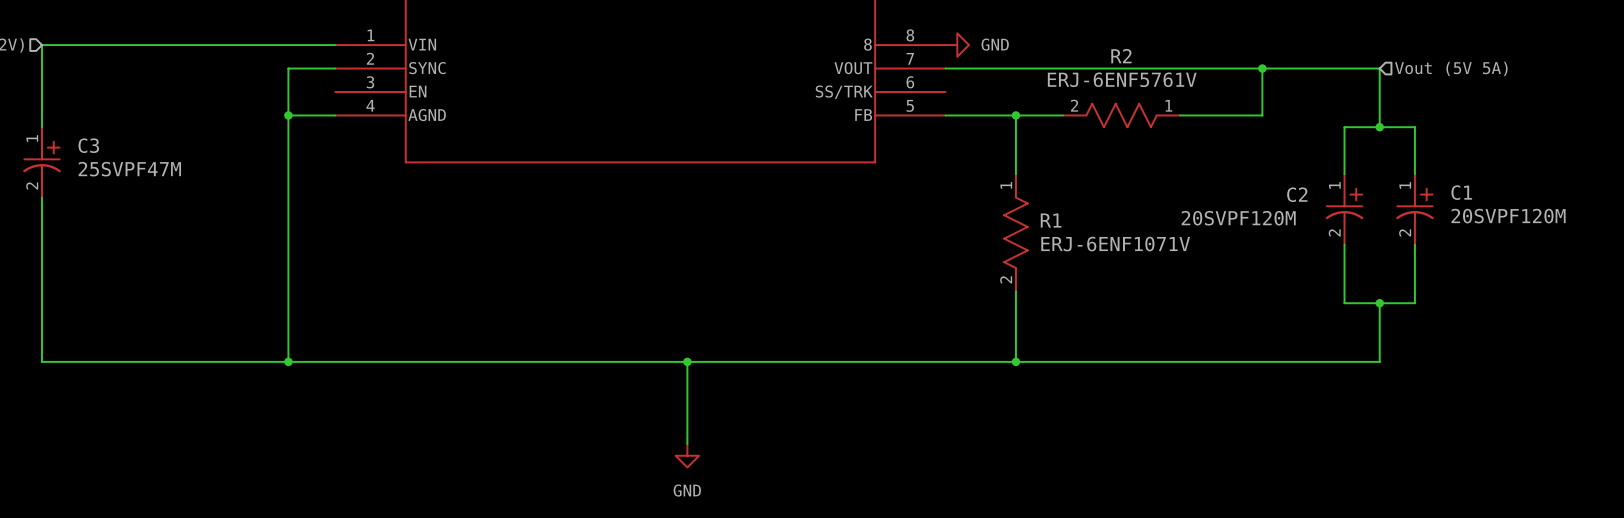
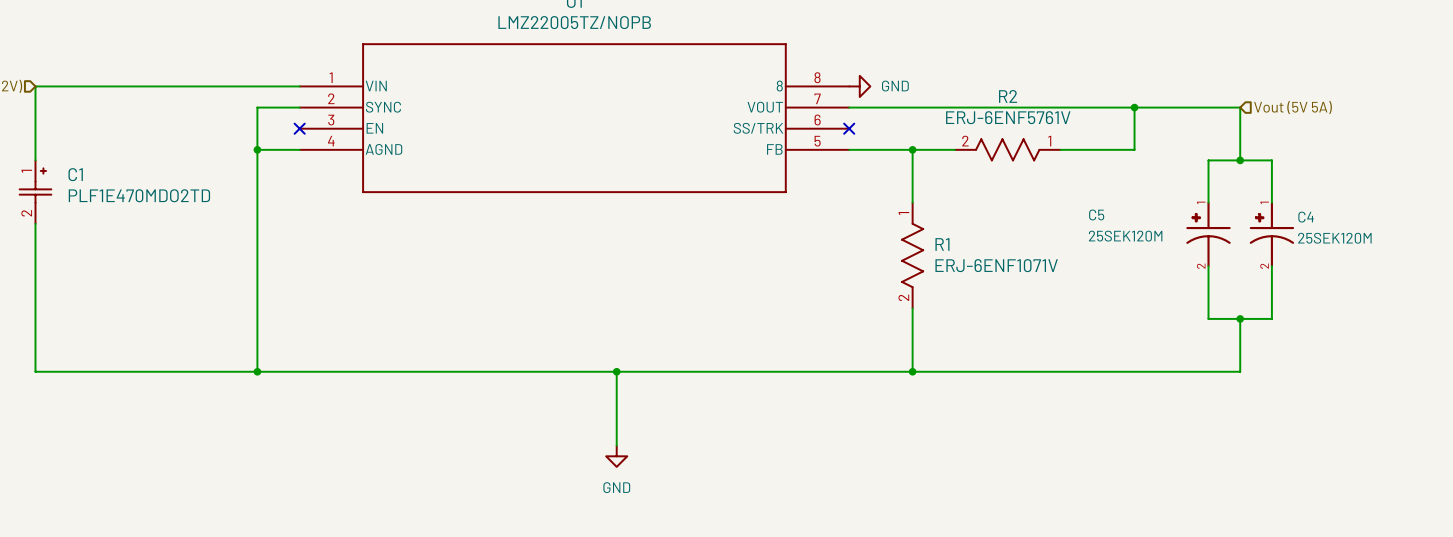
no-connect mark: none -> (299, 128)
no-connect mark: none -> (849, 128)
C3: 25SVPF47M (41, 162) -> none
C1 symbol: [1396, 174, 1434, 245] -> [18, 160, 53, 224]
C2: 20SVPF120M (1344, 209) -> none
C5: none -> 25SEK120M (1208, 234)
C4: none -> 25SEK120M (1271, 234)
C1 value: 20SVPF120M (1508, 216) -> PLF1E470MDO2TD (139, 195)

